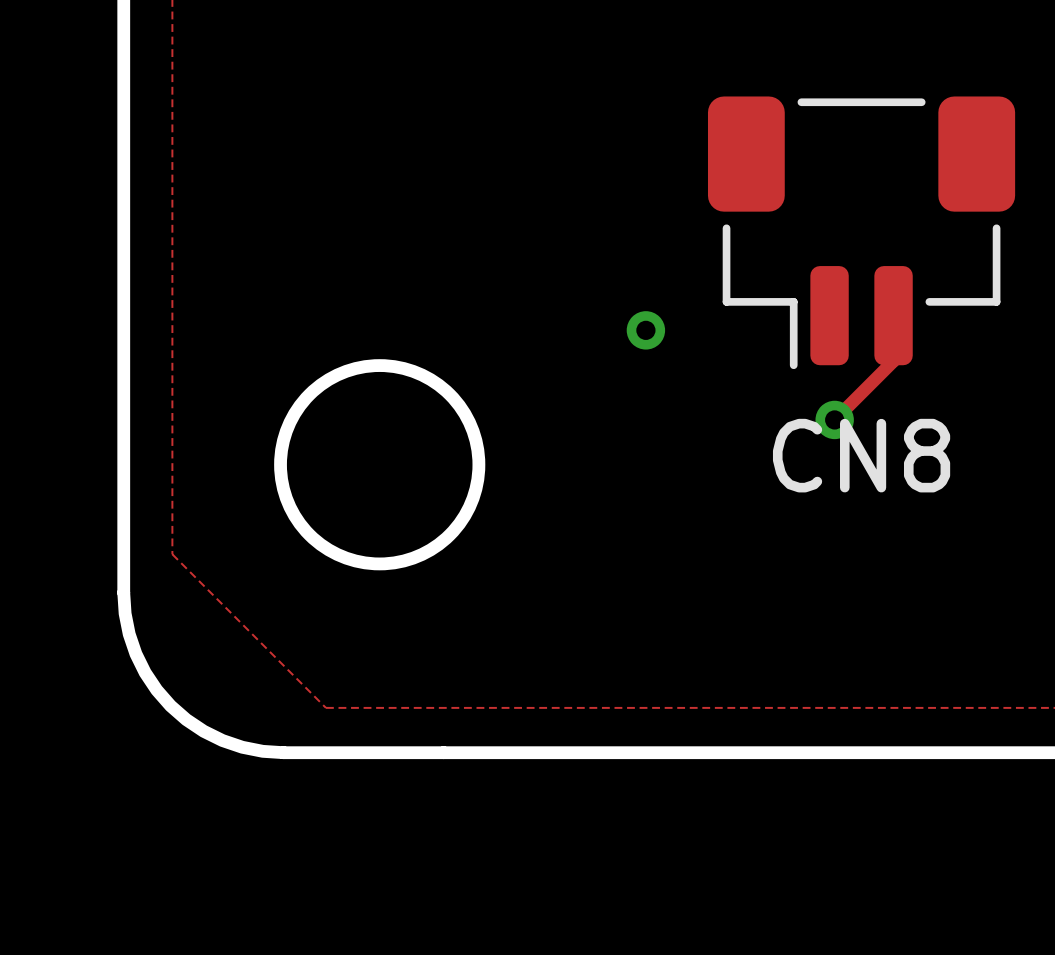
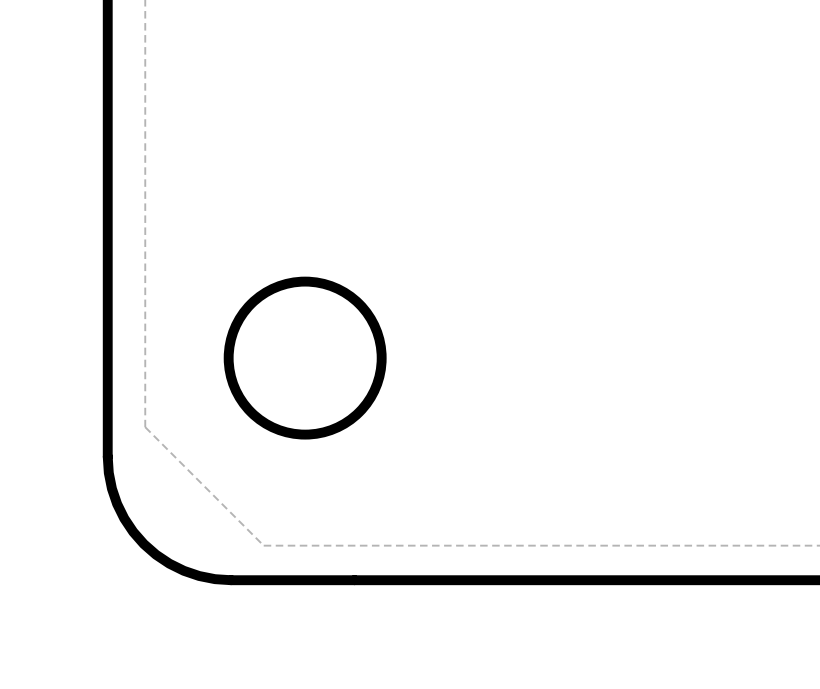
CN8: (861, 232) -> none
track: (893, 315) (893, 361) (834, 419) -> none
via: (645, 330) -> none
via: (834, 419) -> none

